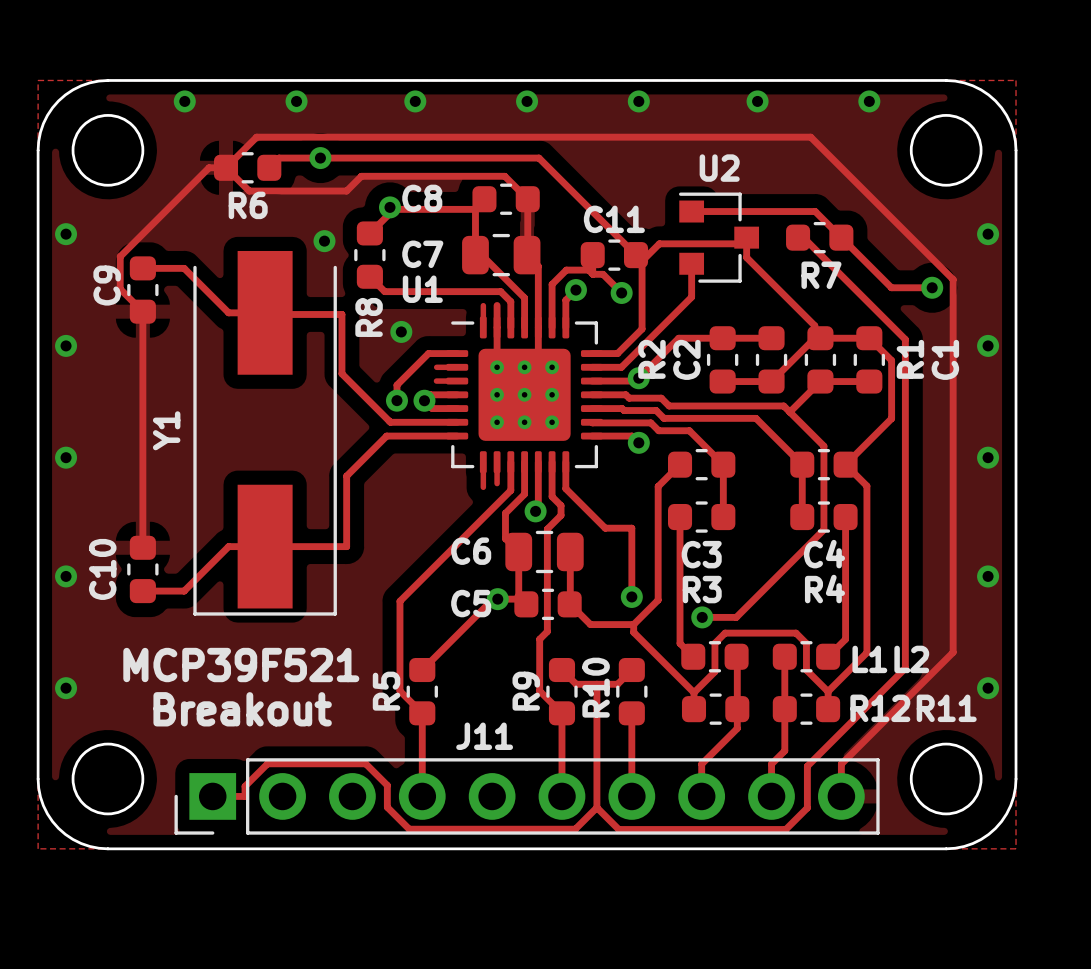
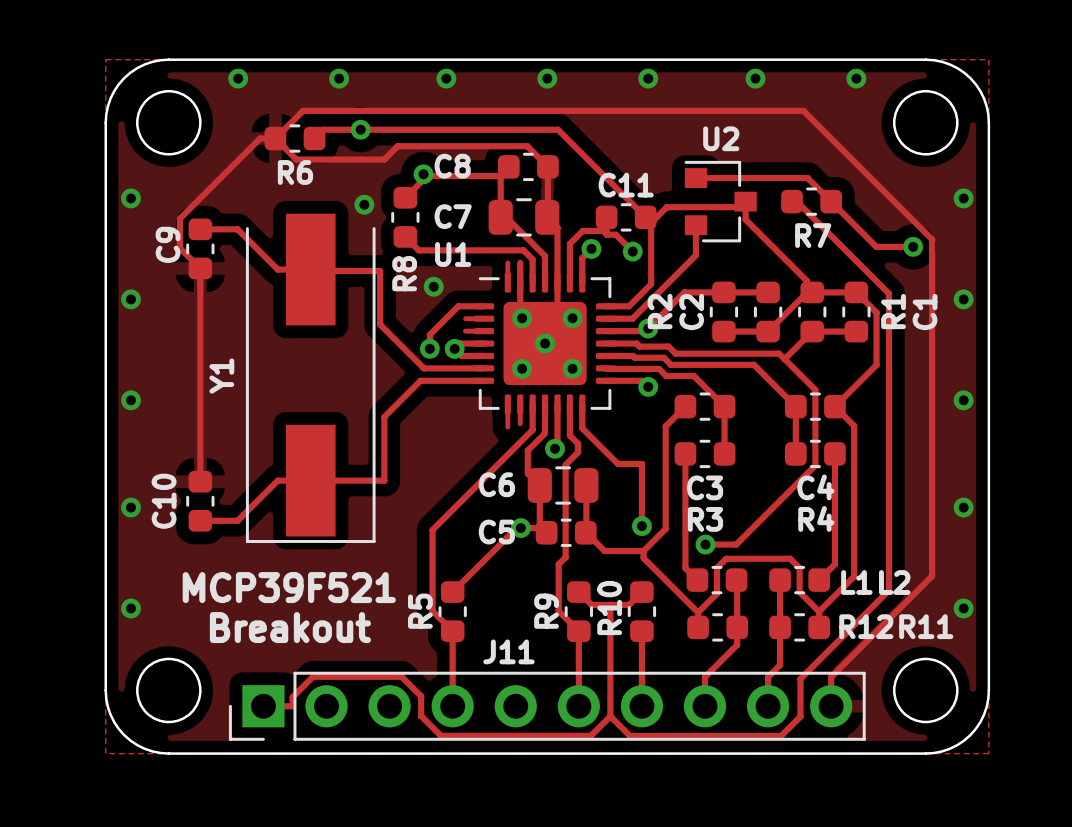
U1 footprint: [446, 316, 603, 474] -> [474, 272, 616, 415]
via: none -> (522, 318)
via: none -> (572, 318)
via: none -> (545, 343)
via: none -> (522, 368)
via: none -> (572, 368)

